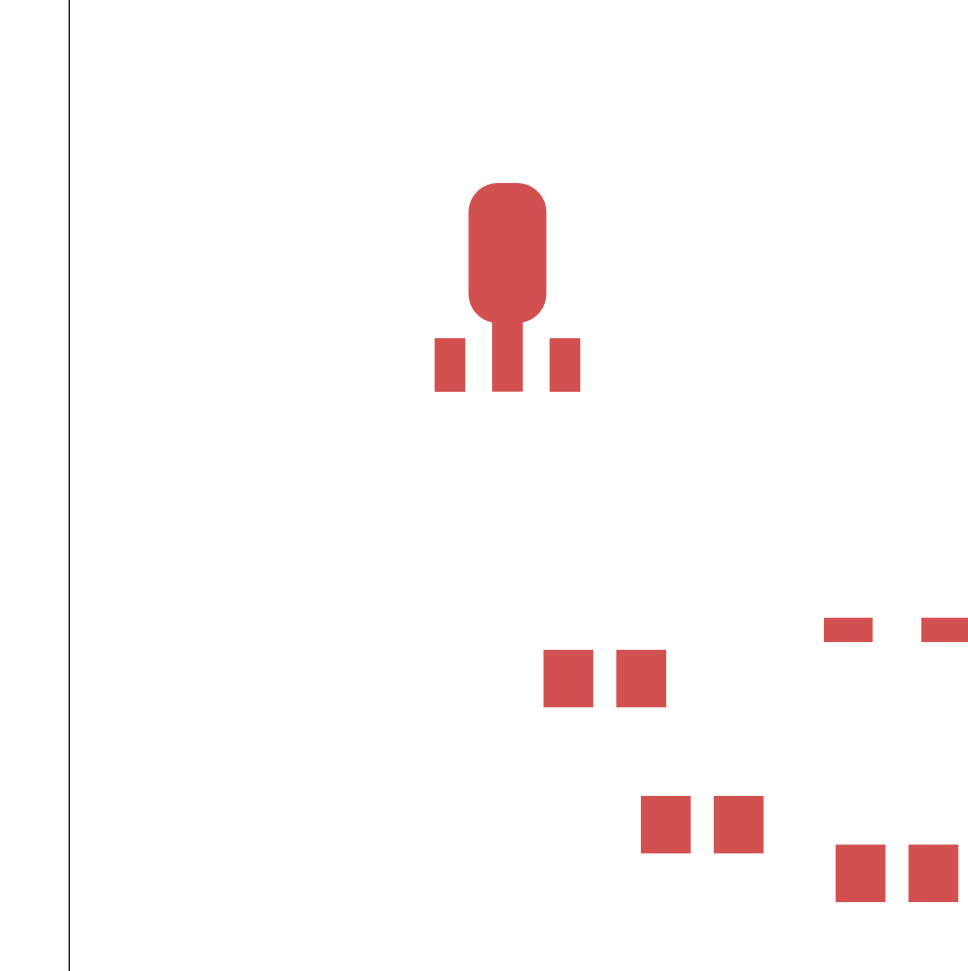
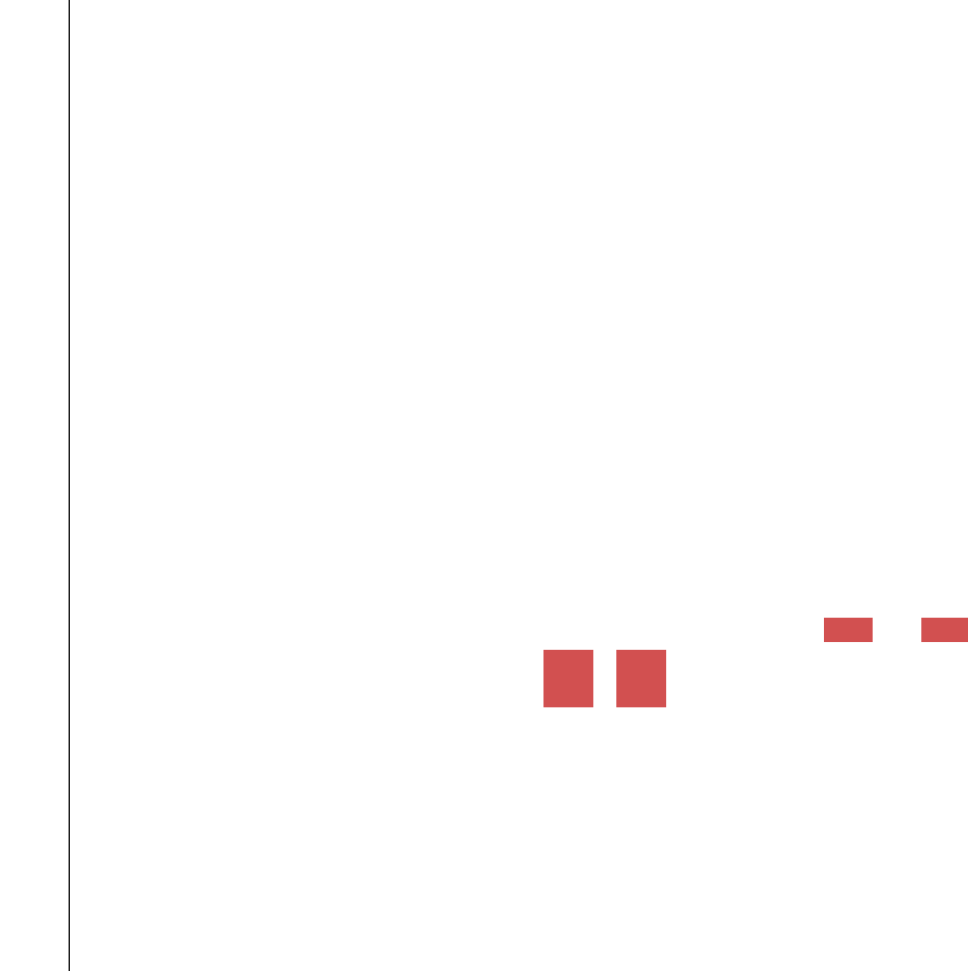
part: (507, 287) -> none
part: (702, 824) -> none
part: (896, 873) -> none

